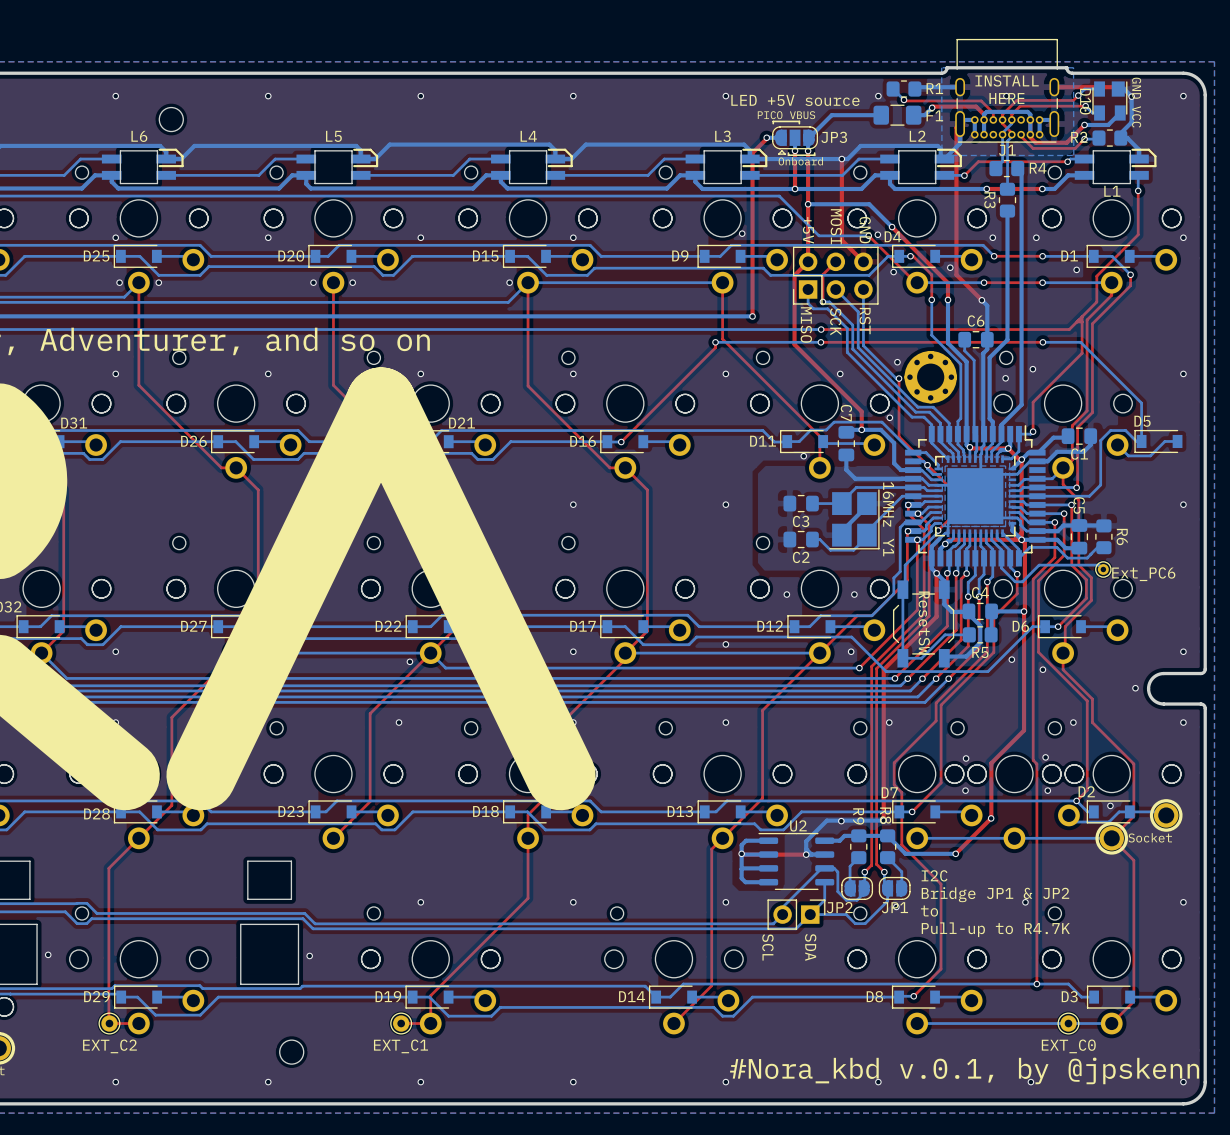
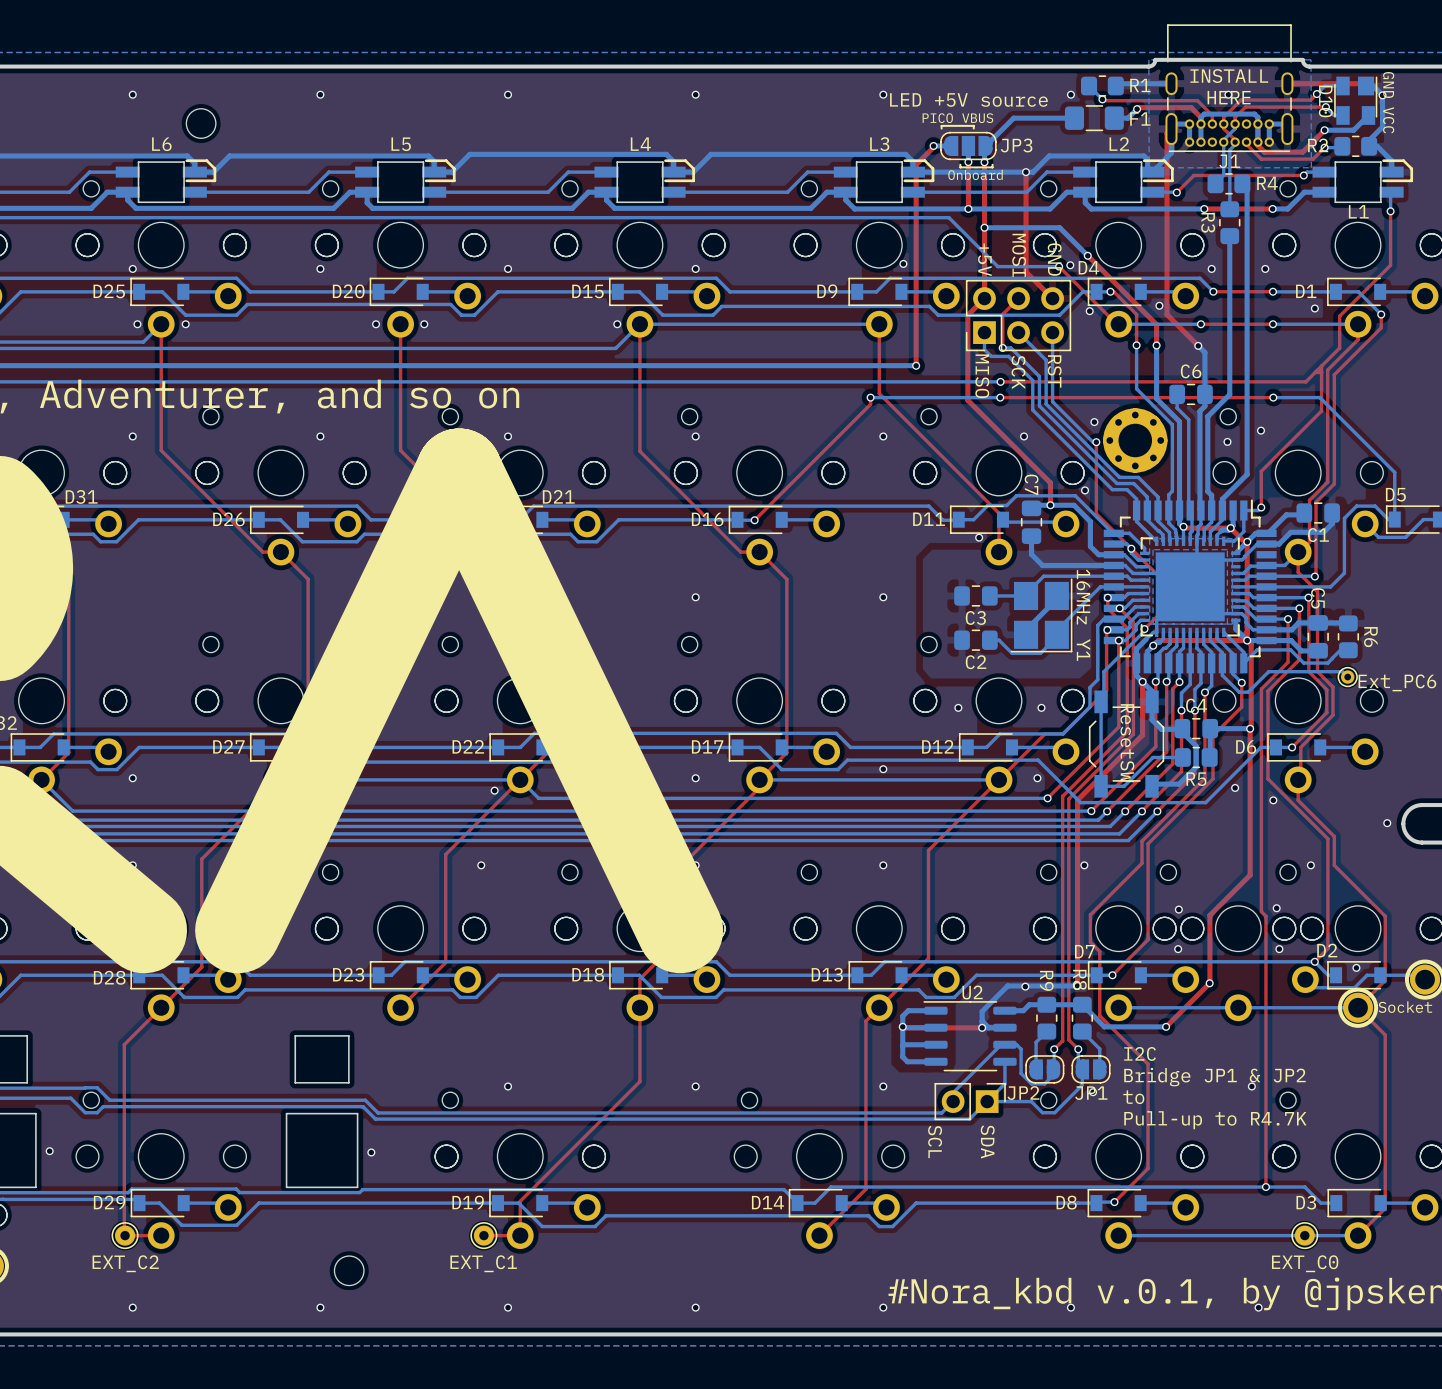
JP3 footprint: [772, 126, 819, 155] -> [940, 131, 997, 161]

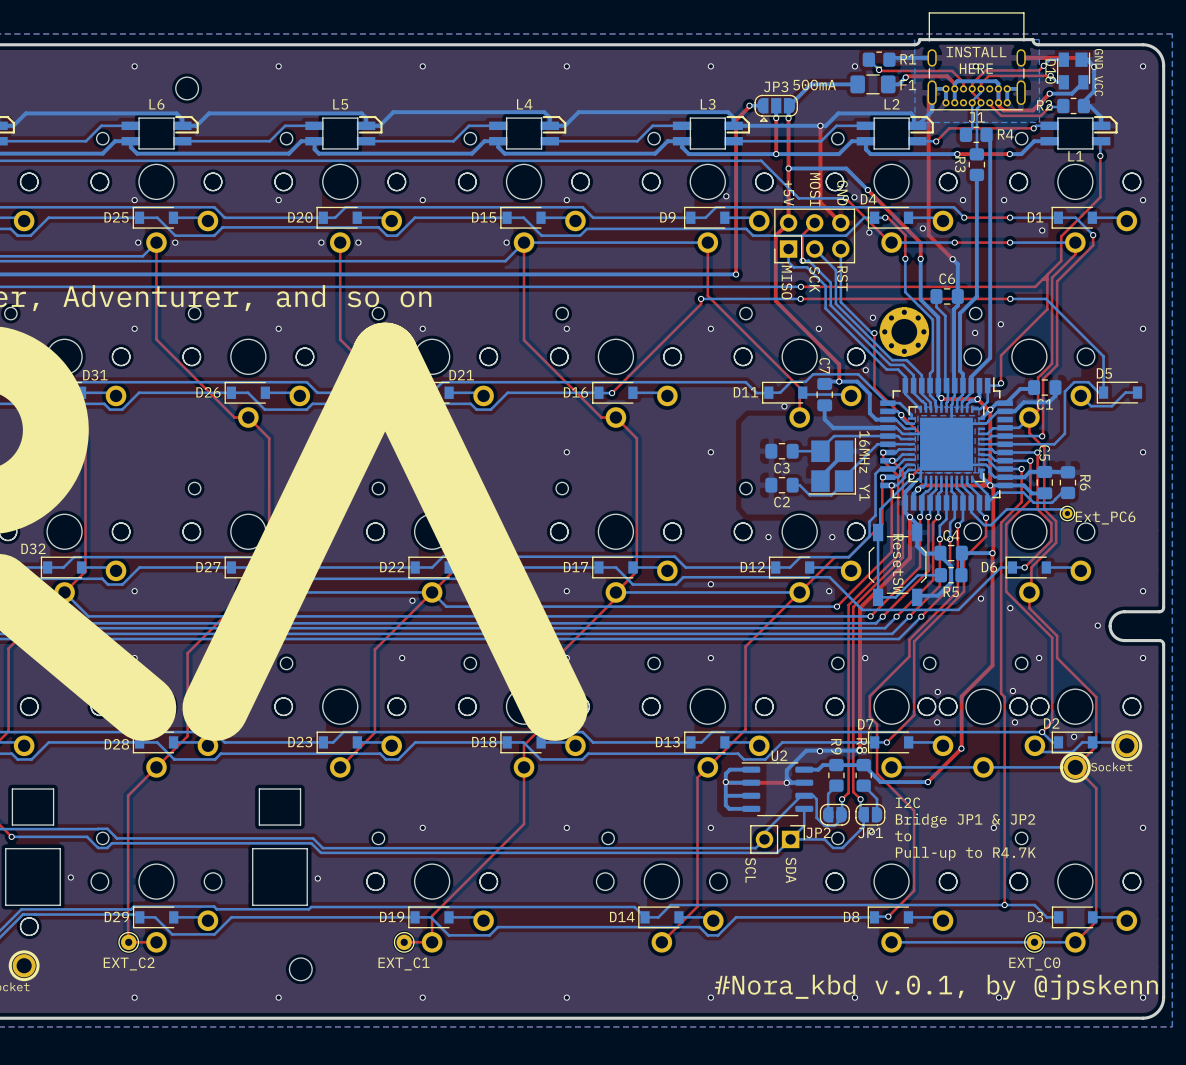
F1 value: none -> 500mA (814, 85)
line: (973, 128) (973, 125) (941, 125) (941, 128) -> none
JP3 footprint: [940, 131, 997, 161] -> [754, 94, 798, 122]
JP3 name position: JP3 (1016, 145) -> JP3 (776, 86)
line: (992, 164) (992, 167) (960, 167) (960, 164) -> none

